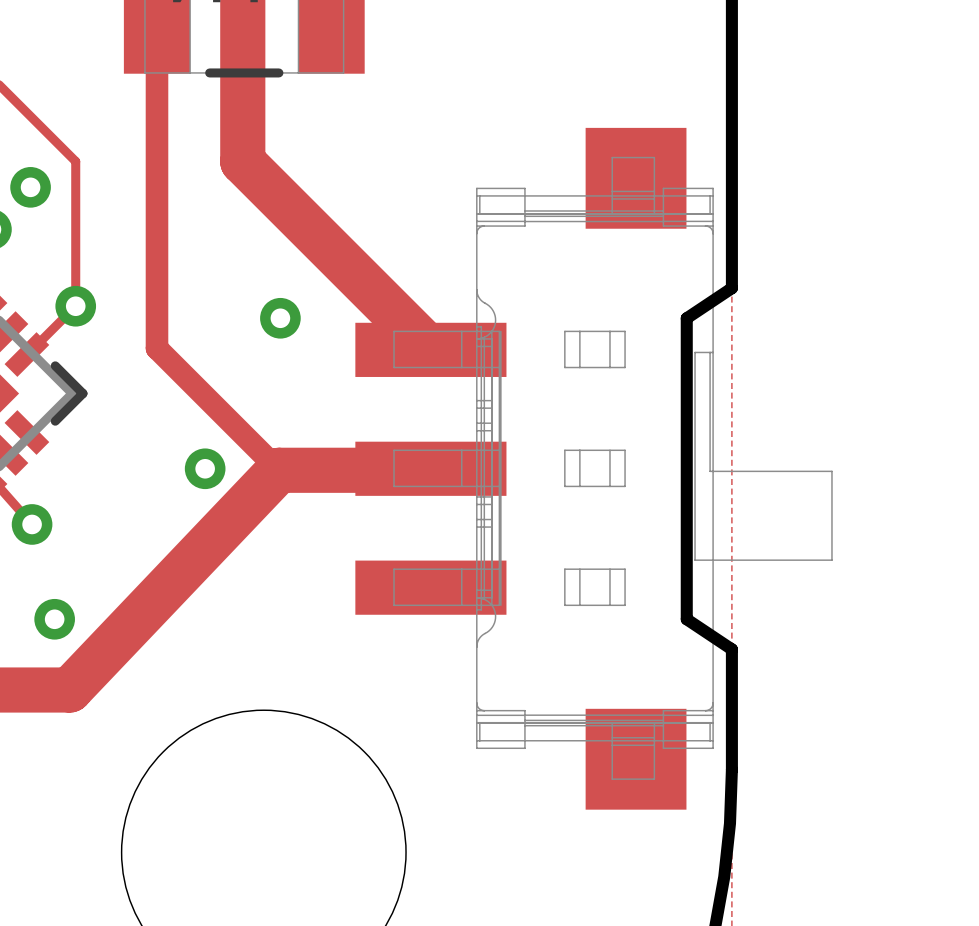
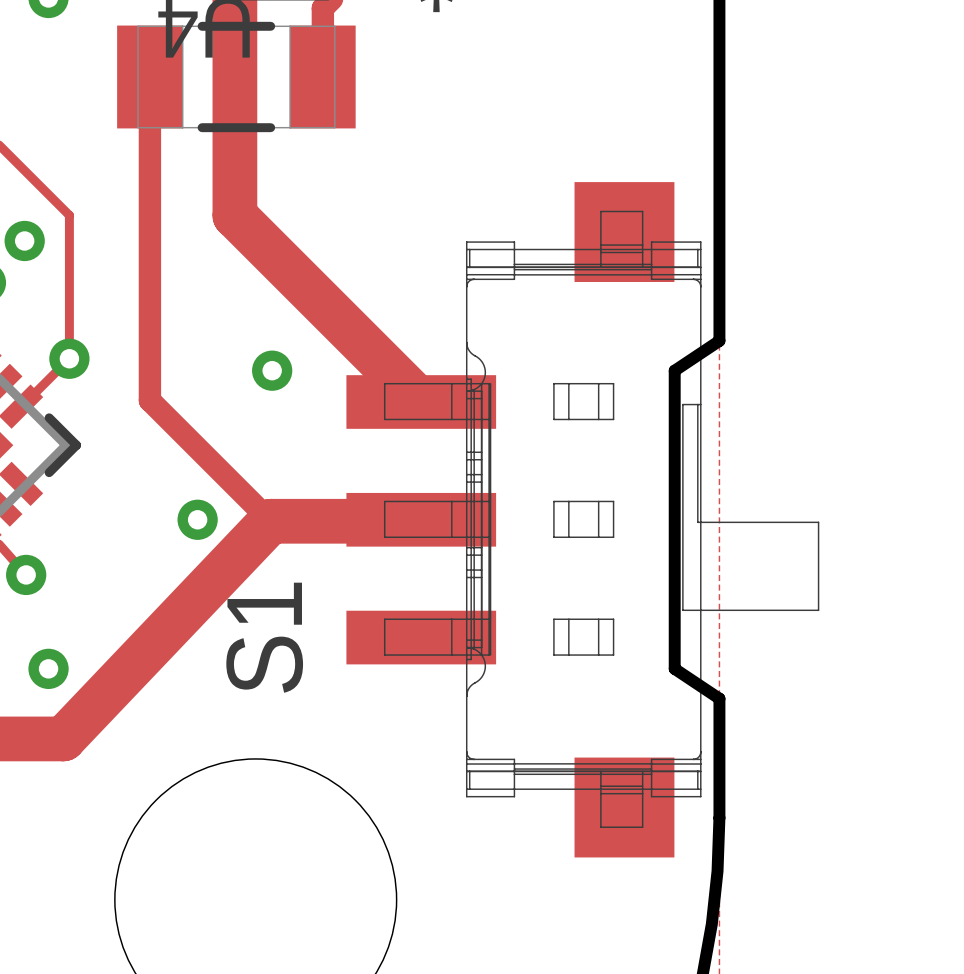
part: (594, 468) -> none
S1: none -> (582, 519)

